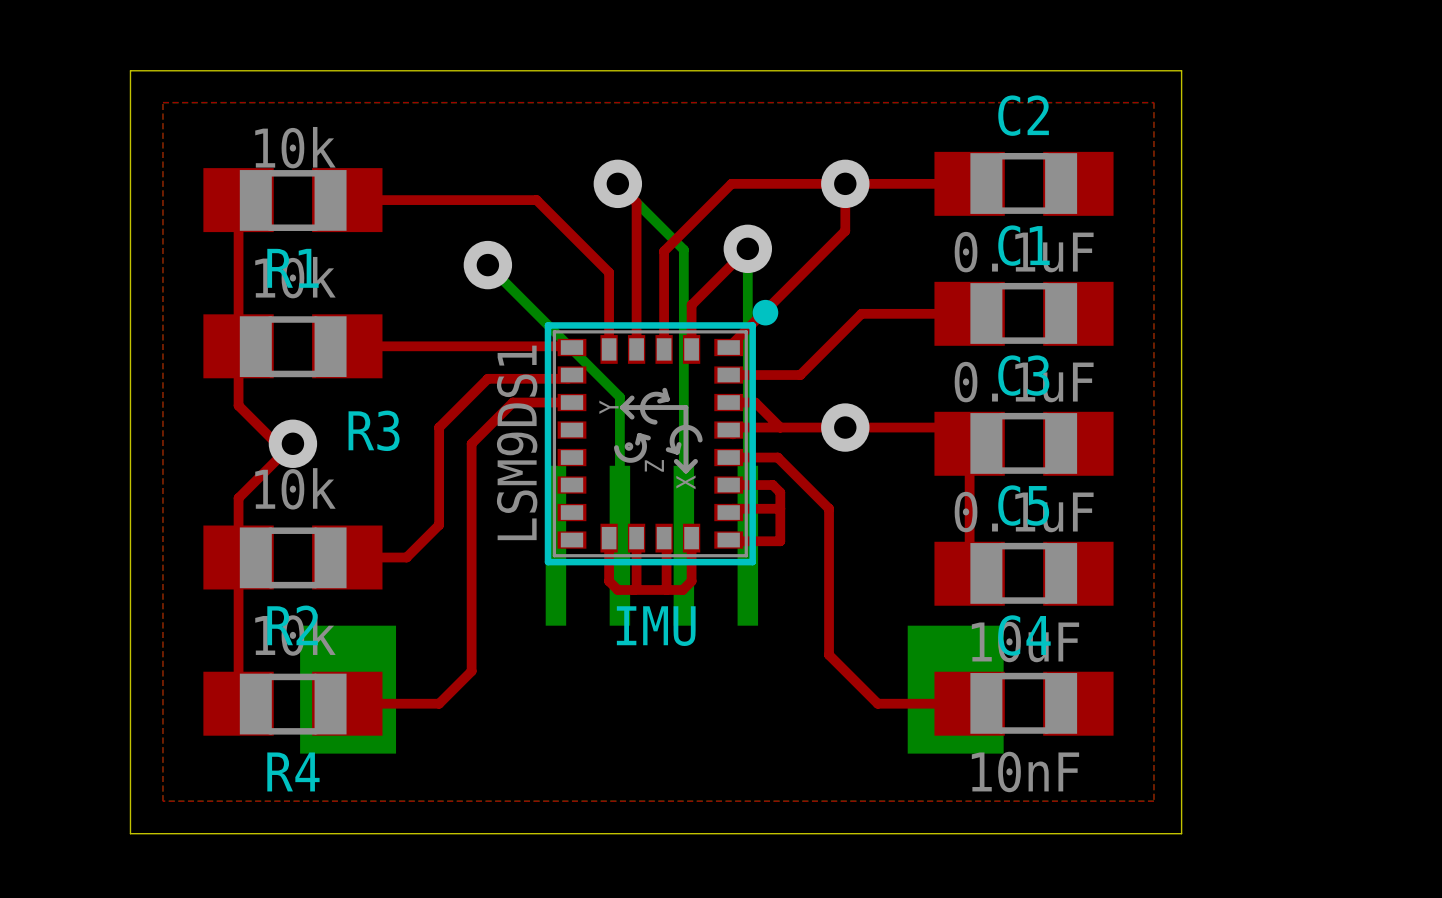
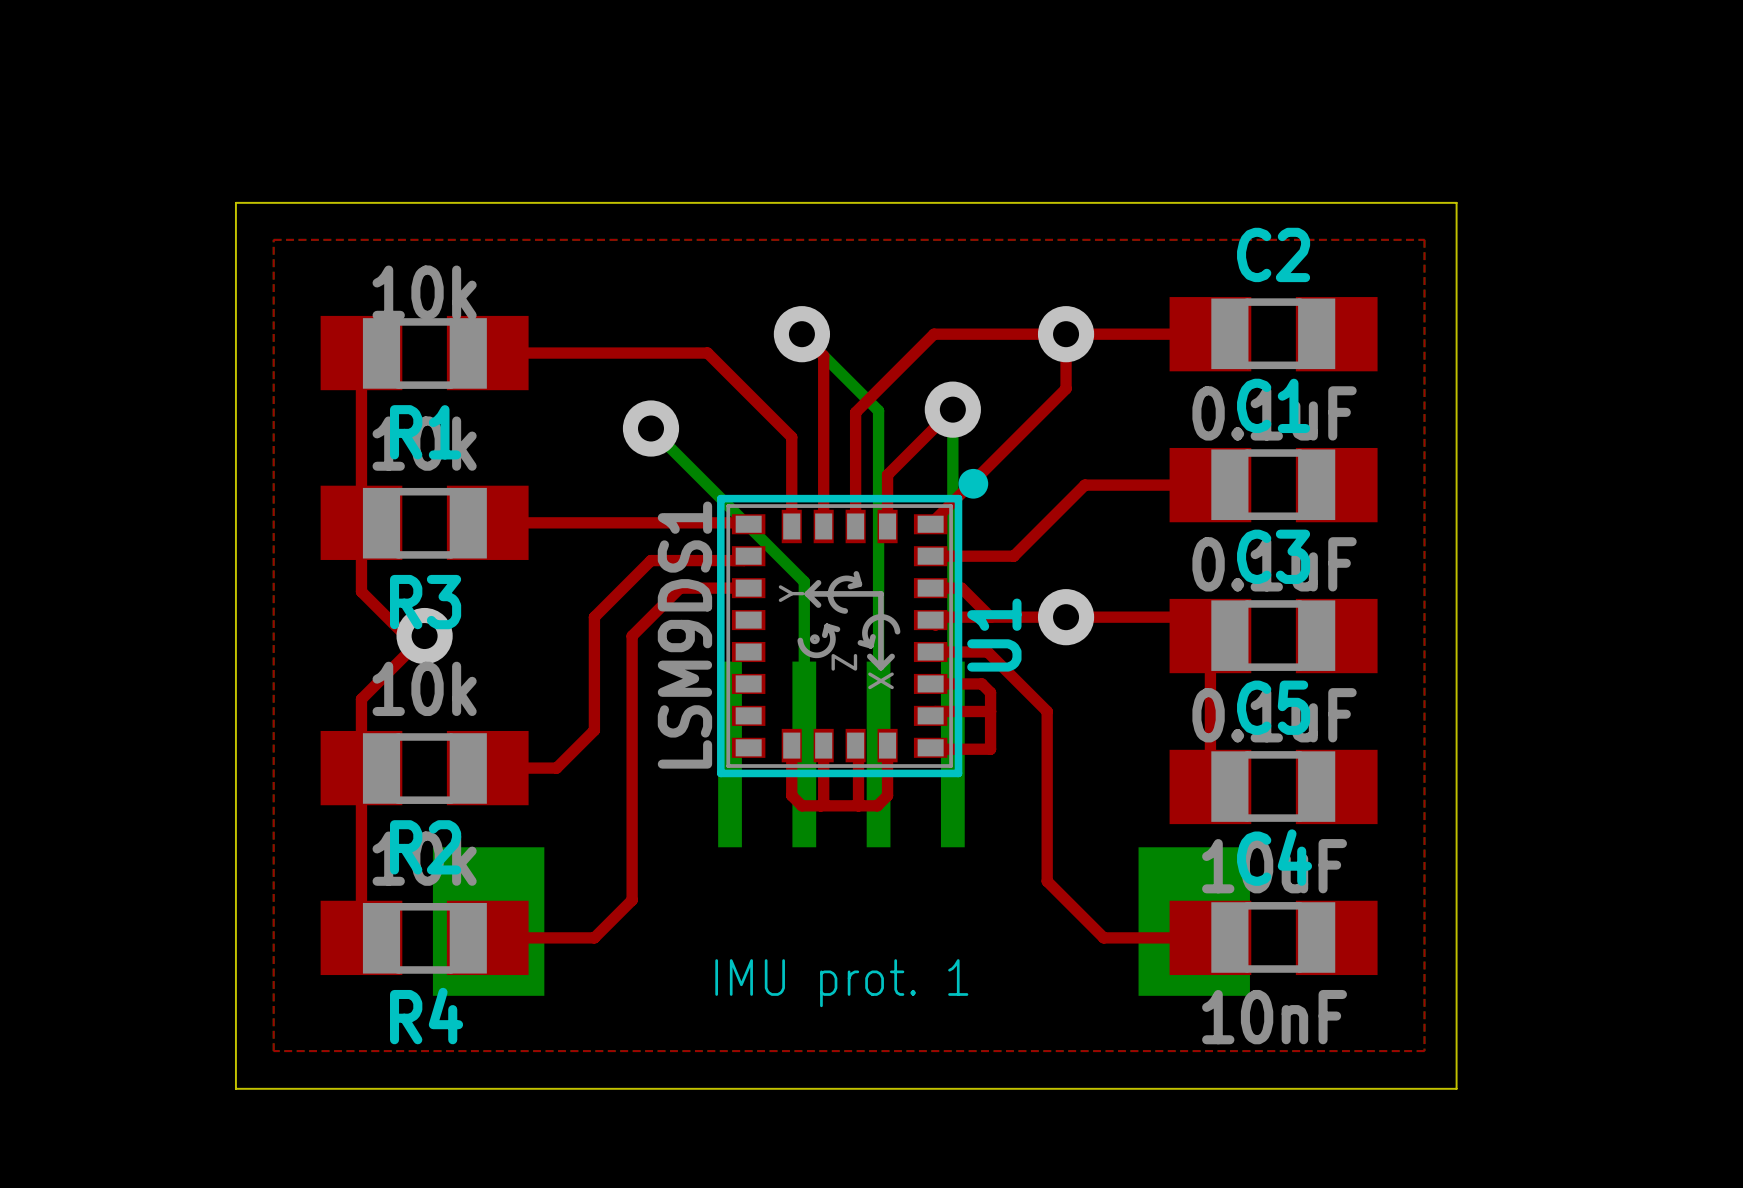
R3 name position: R3 (374, 430) -> R3 (425, 602)
U1 name: none -> U1 (994, 635)
text: IMU (656, 626) -> none
text: none -> IMU prot. 1 (841, 983)

